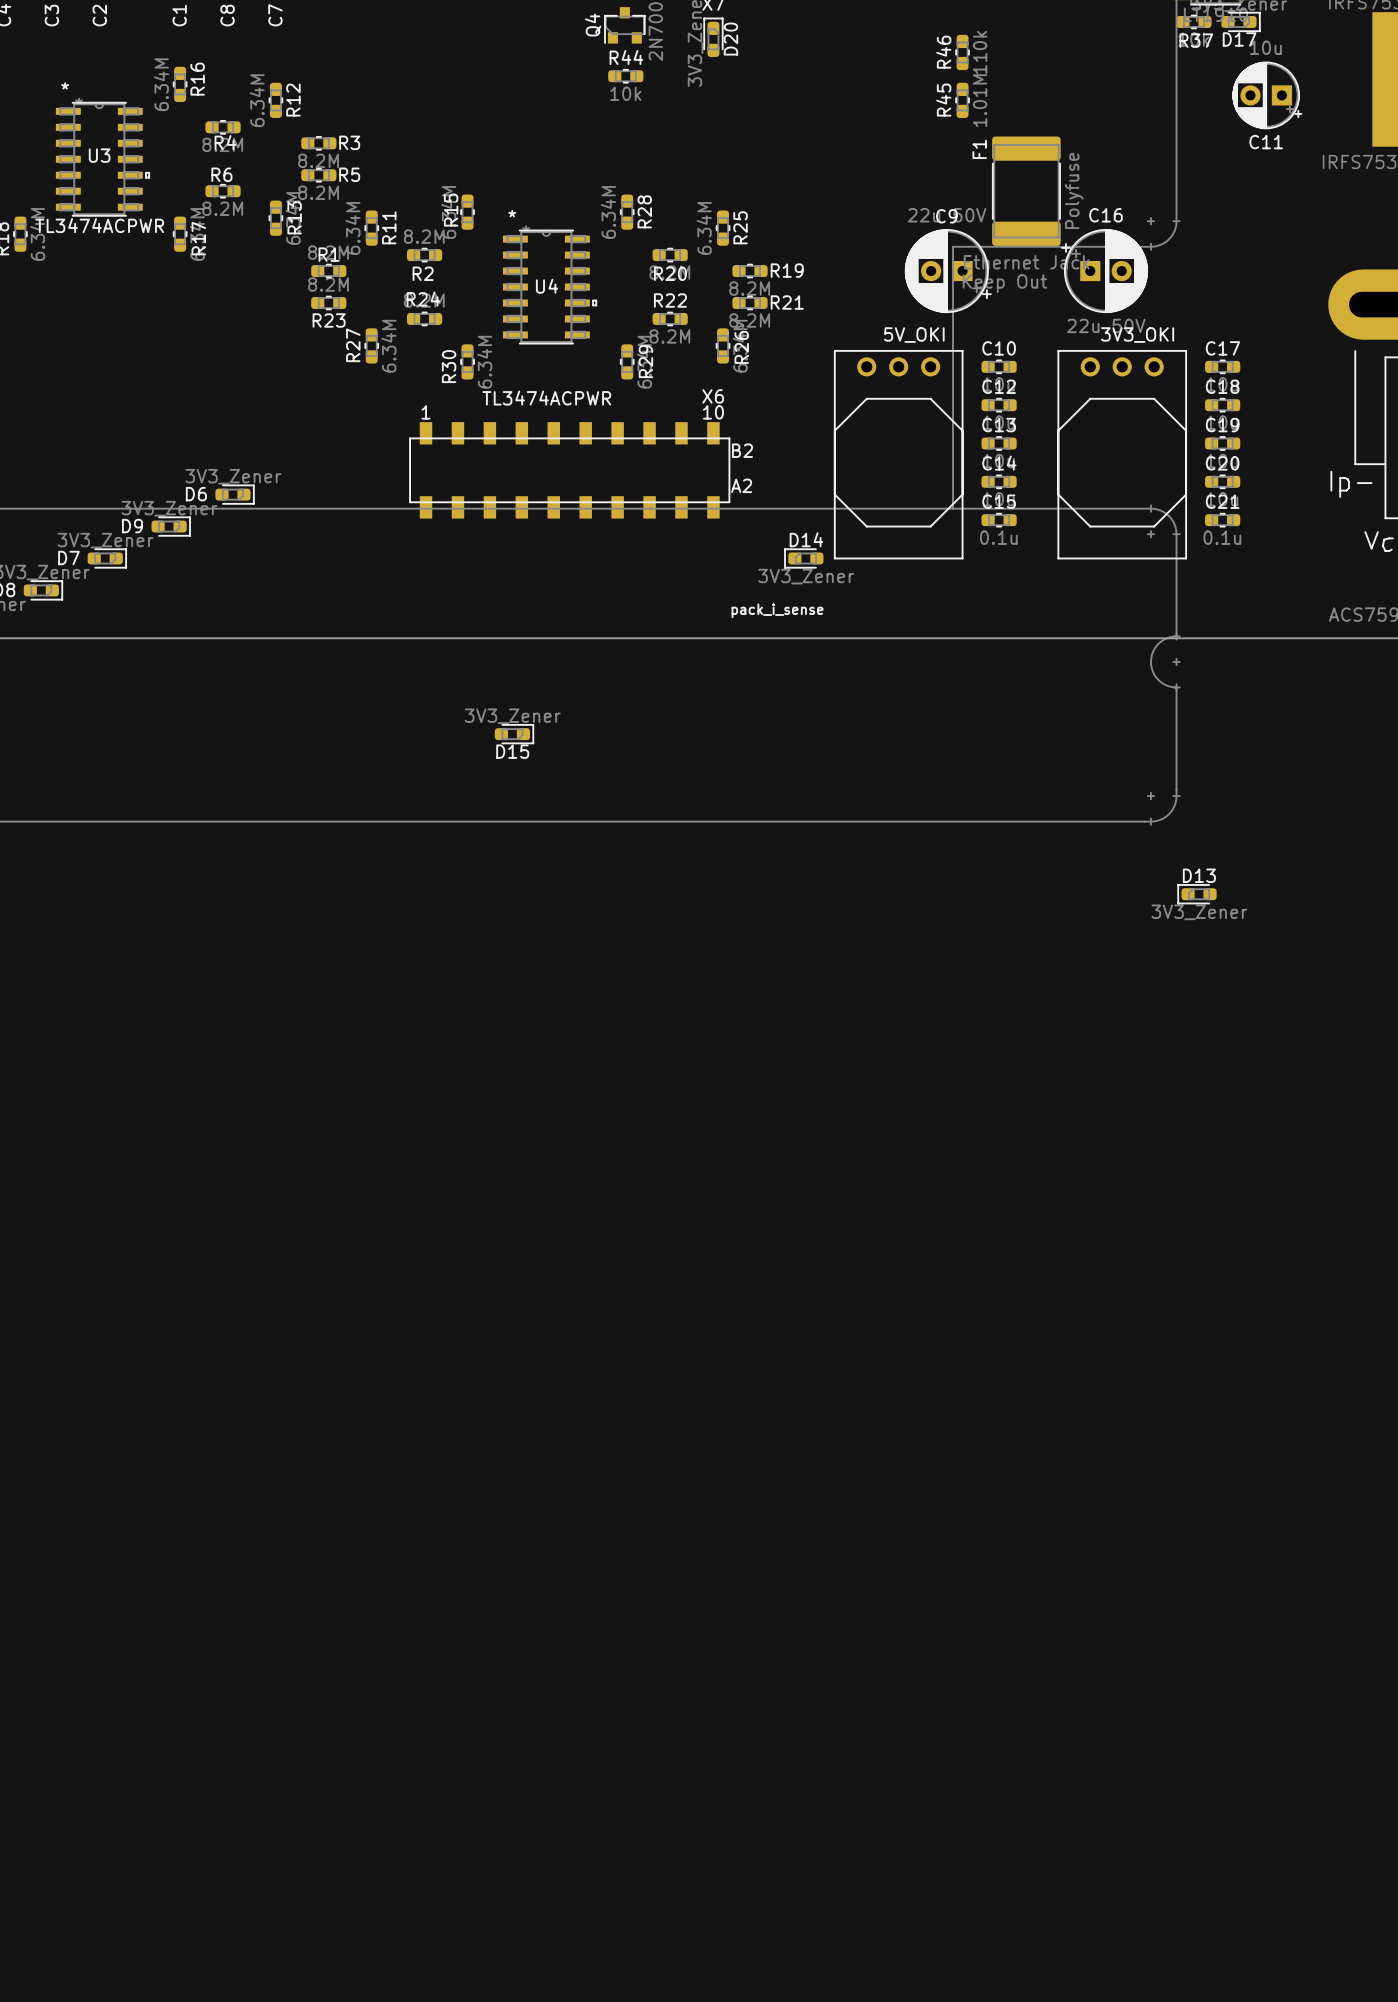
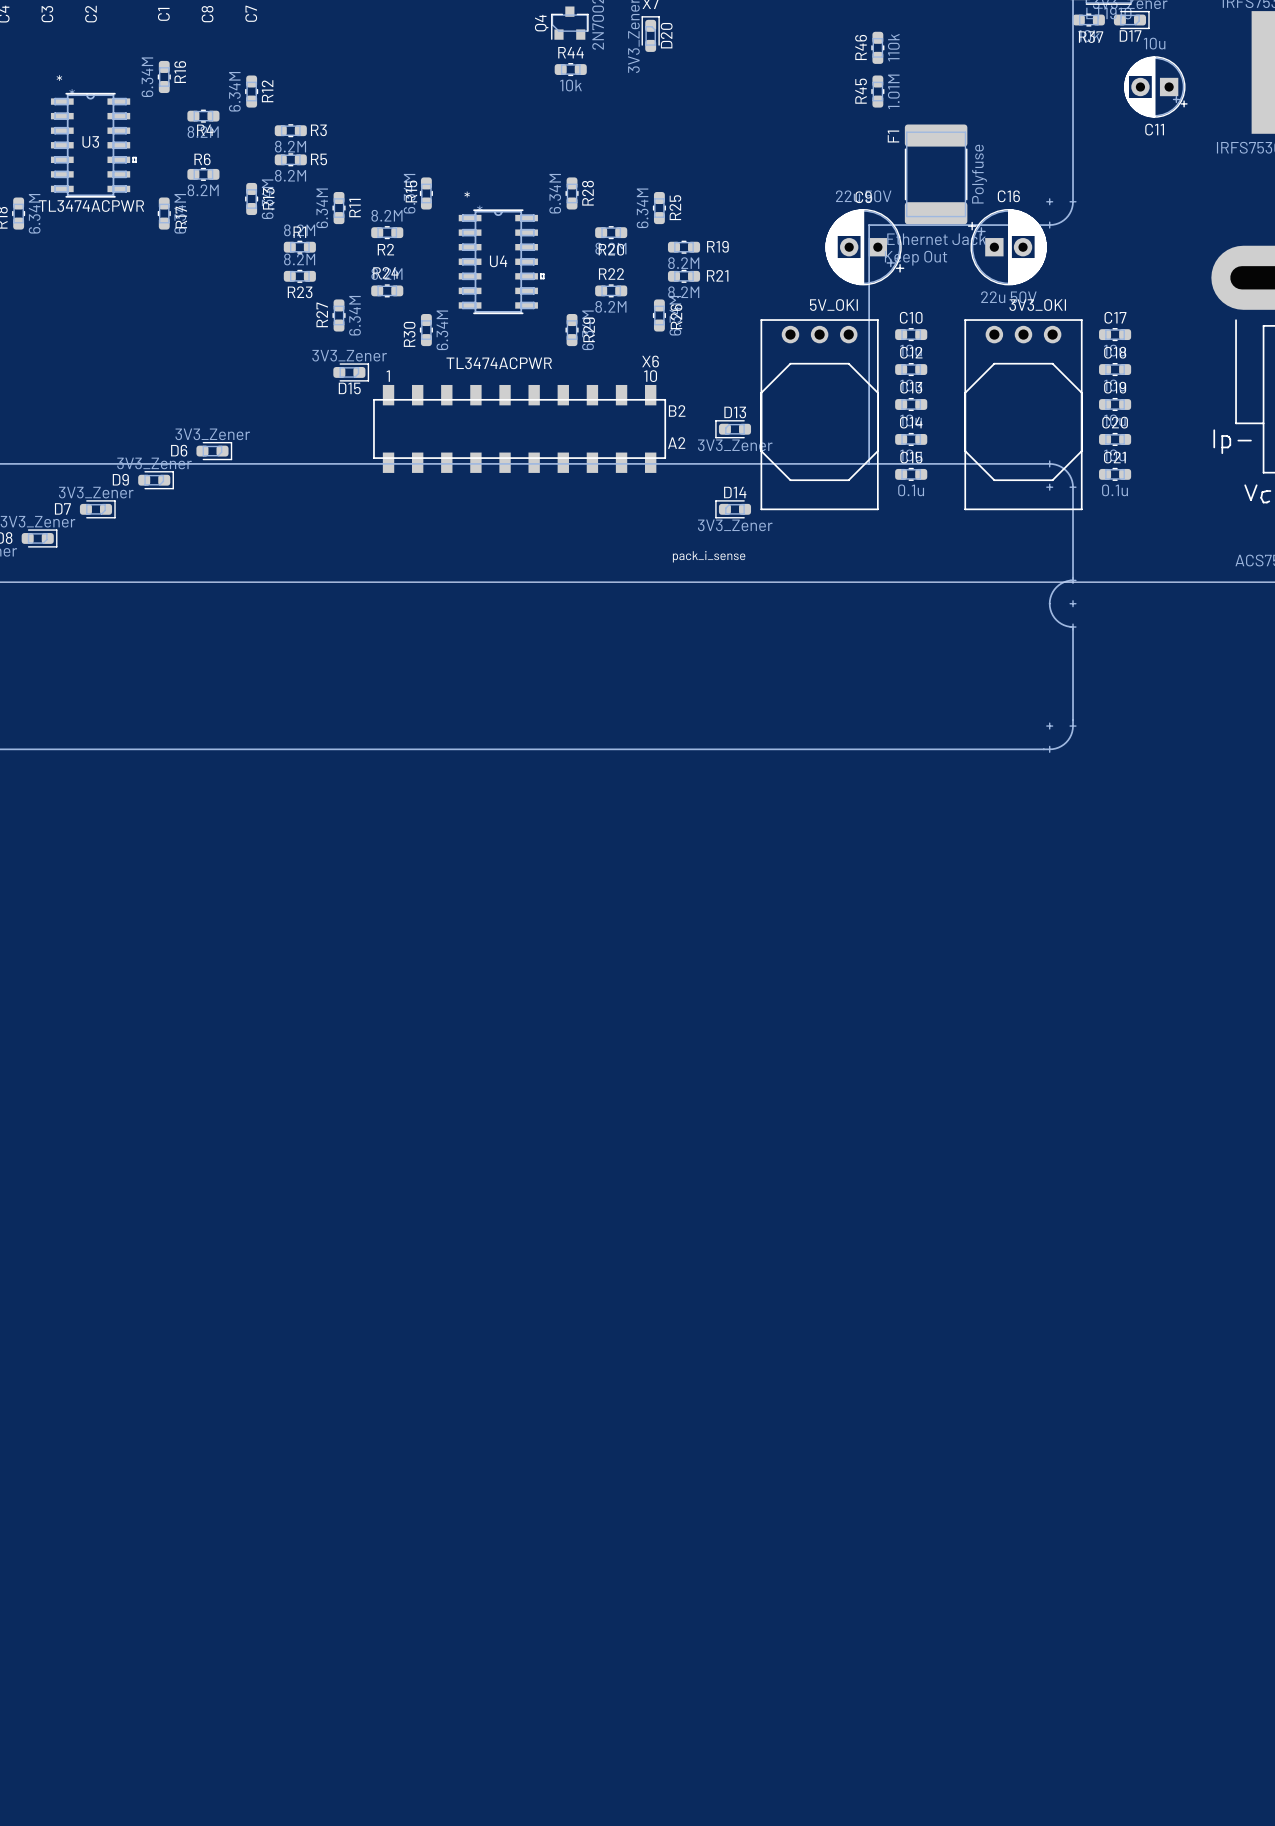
D15 position: (514, 734) -> (351, 372)
D13 position: (1197, 894) -> (733, 429)

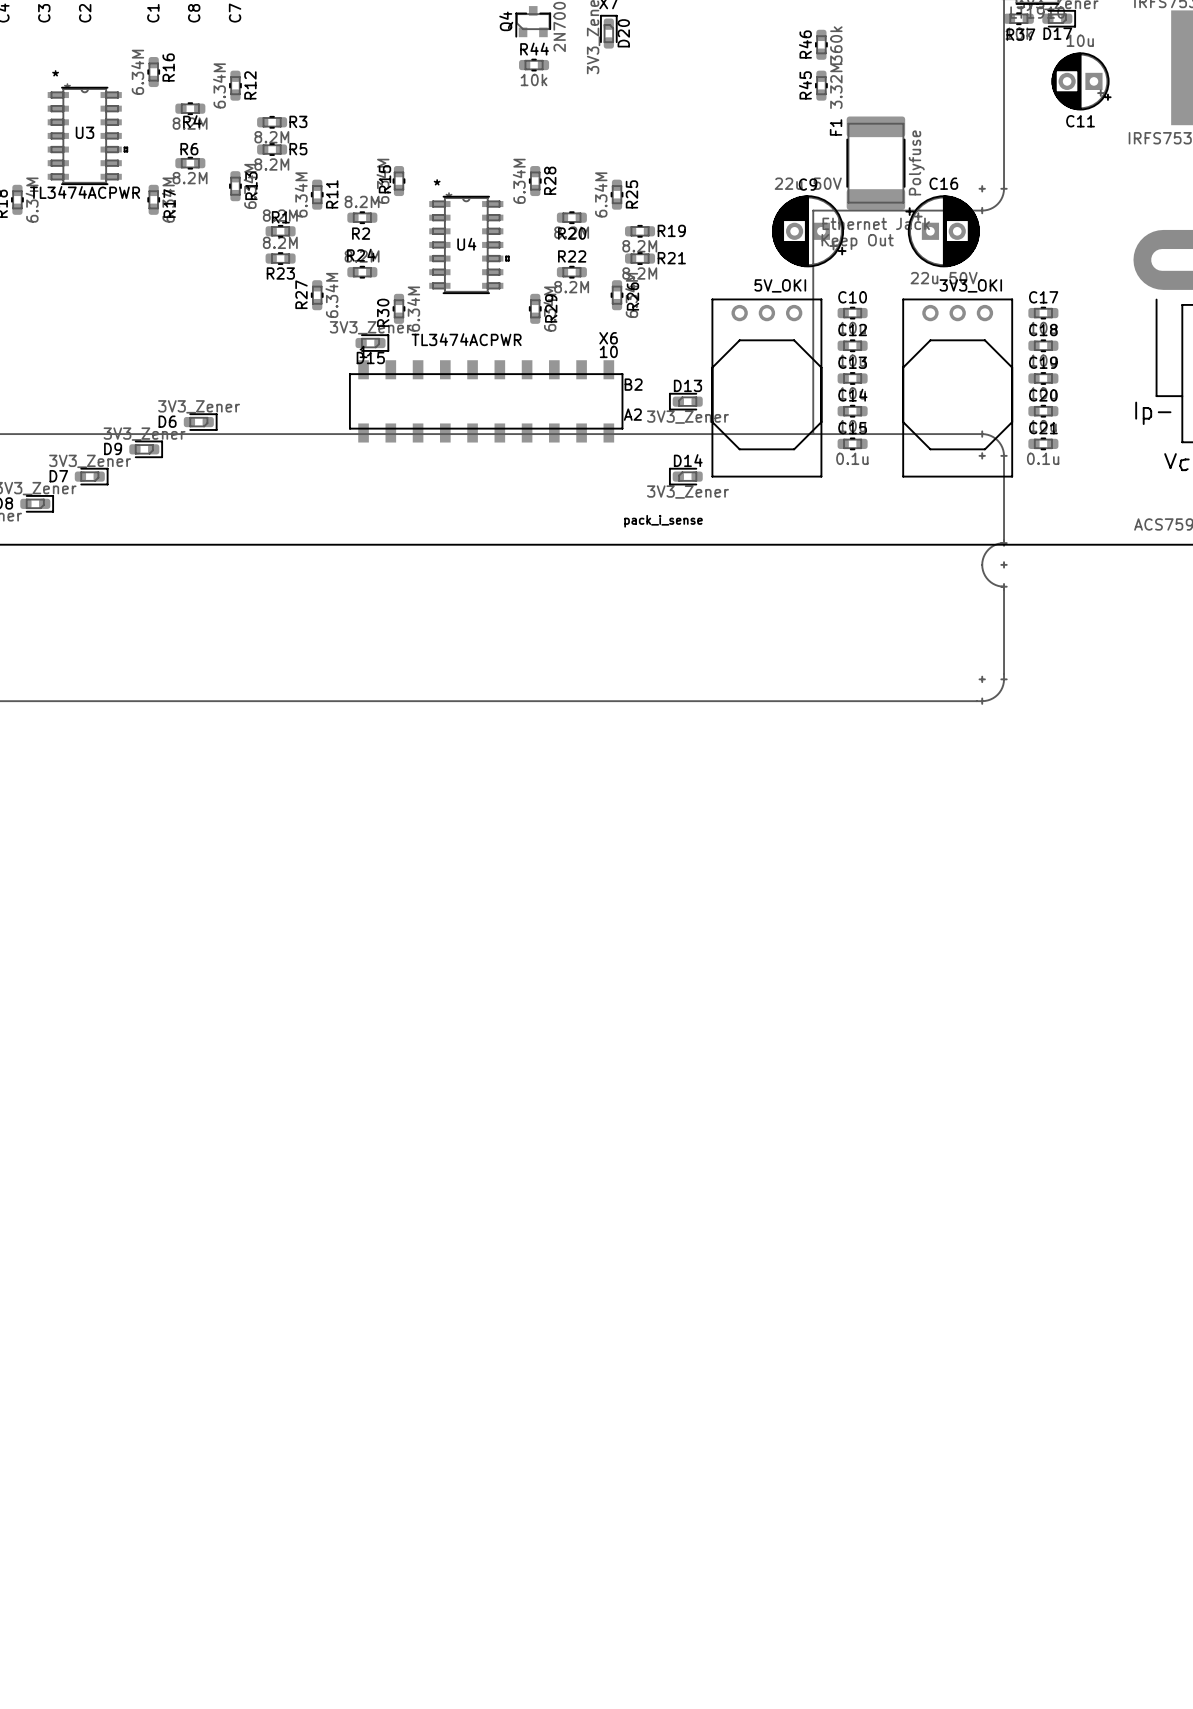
R46 value: 110k (893, 47) -> 360k (836, 45)
R45 value: 1.01M (893, 91) -> 3.32M (836, 86)
D15 position: (351, 372) -> (372, 343)

